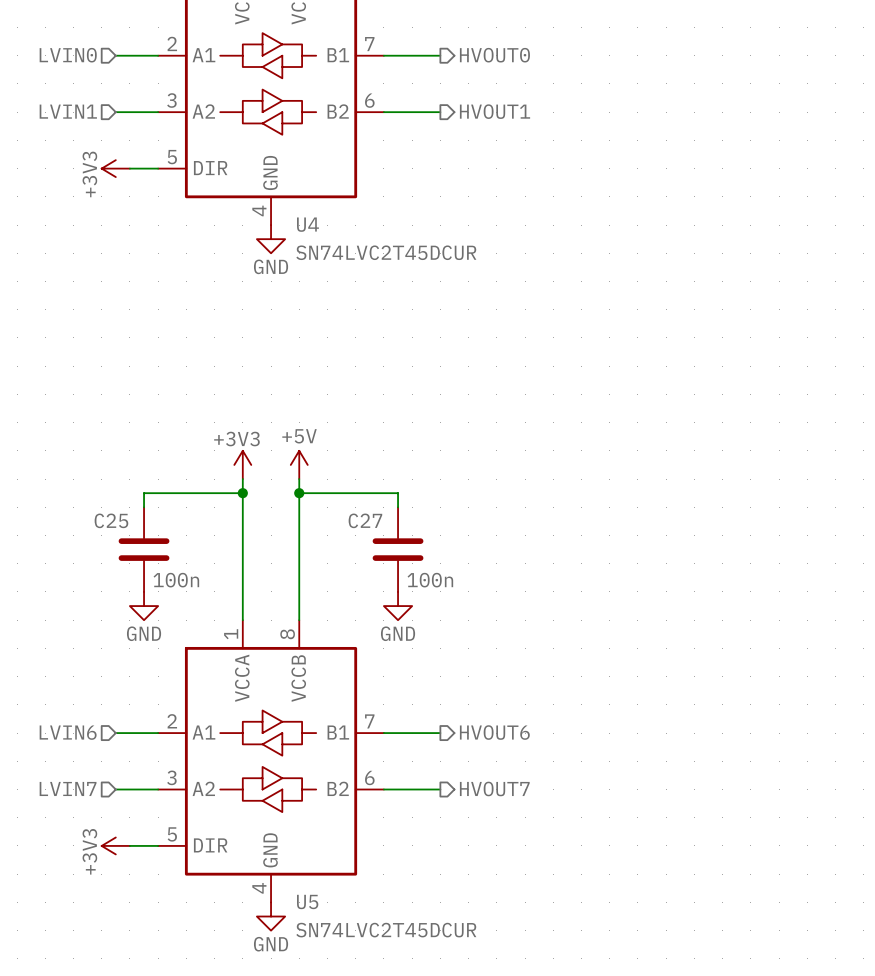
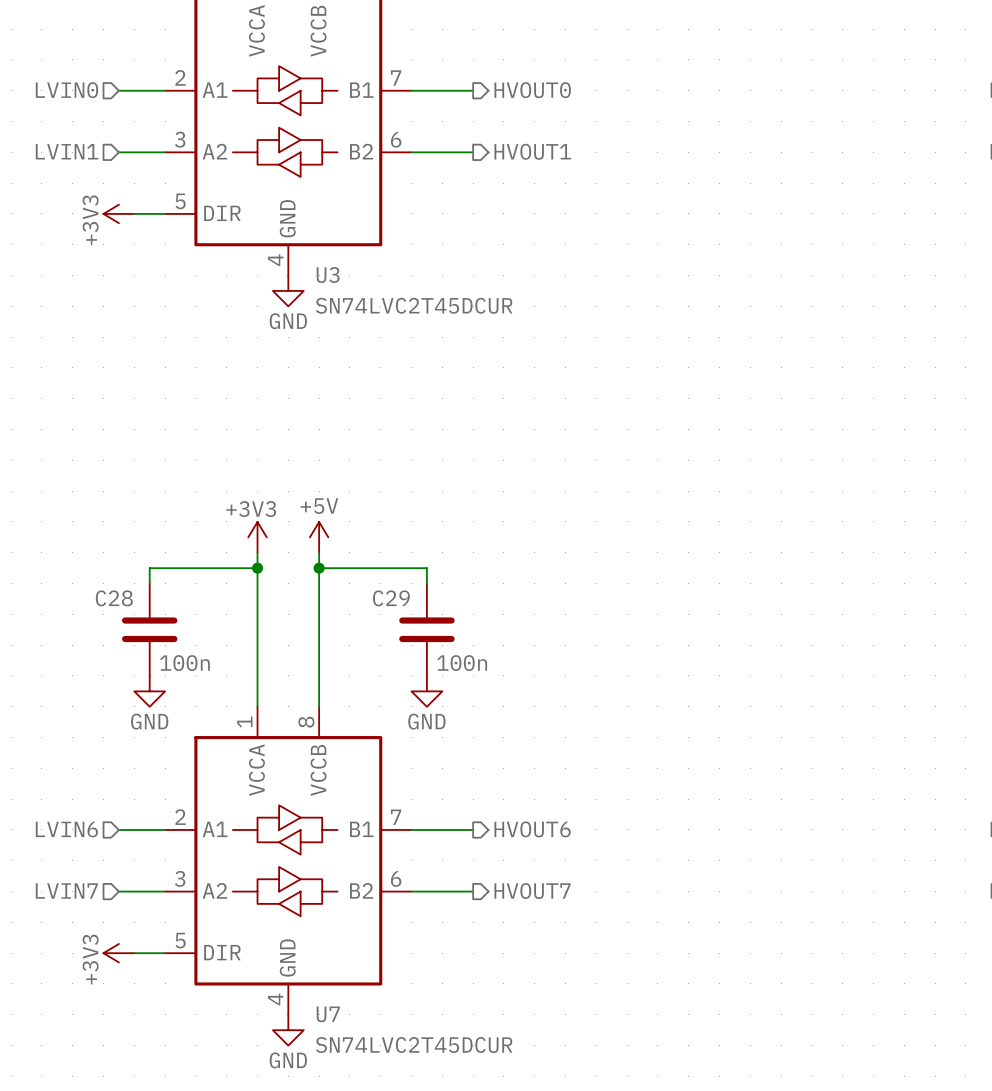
U4 name: U4 (307, 224) -> U3 (328, 274)
C25 name: C25 (111, 520) -> C28 (114, 598)
C27 name: C27 (365, 520) -> C29 (391, 598)
U5 name: U5 (307, 901) -> U7 (328, 1014)

